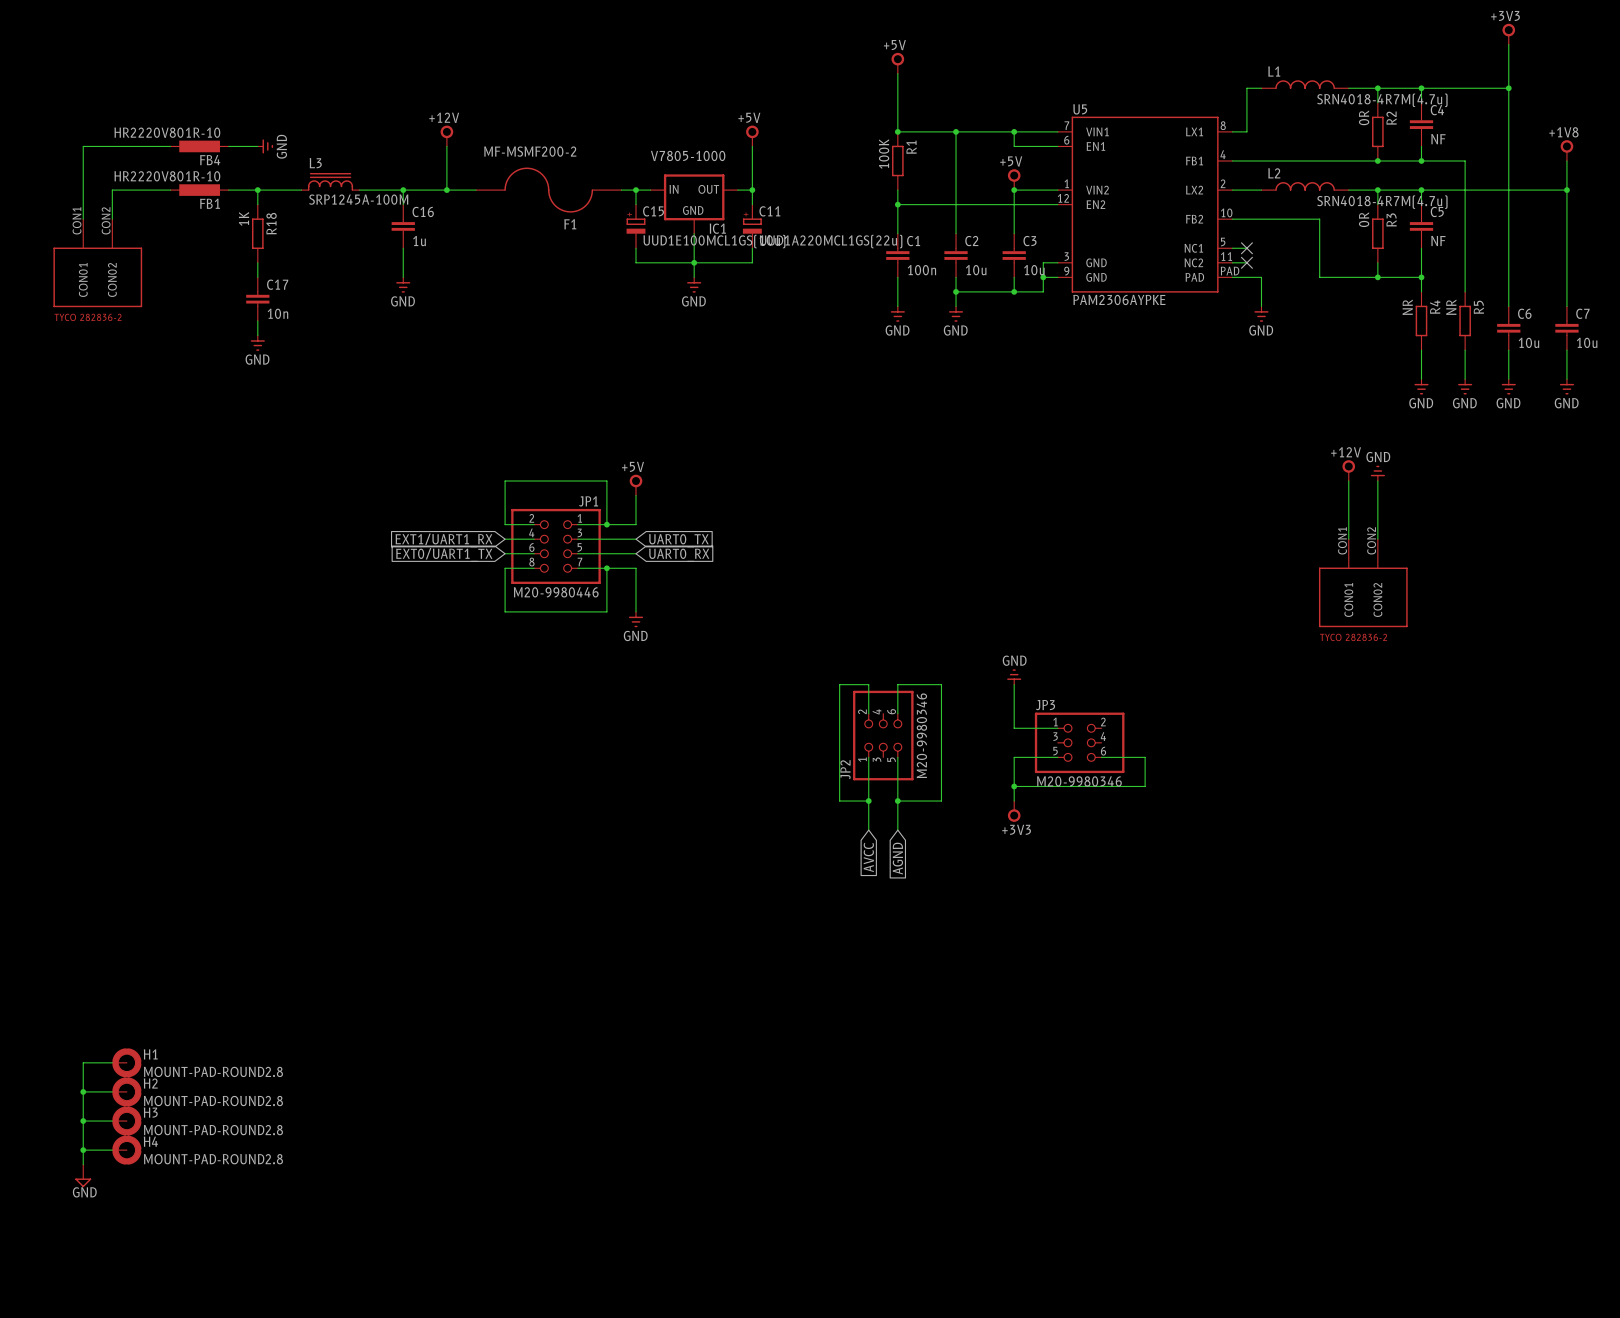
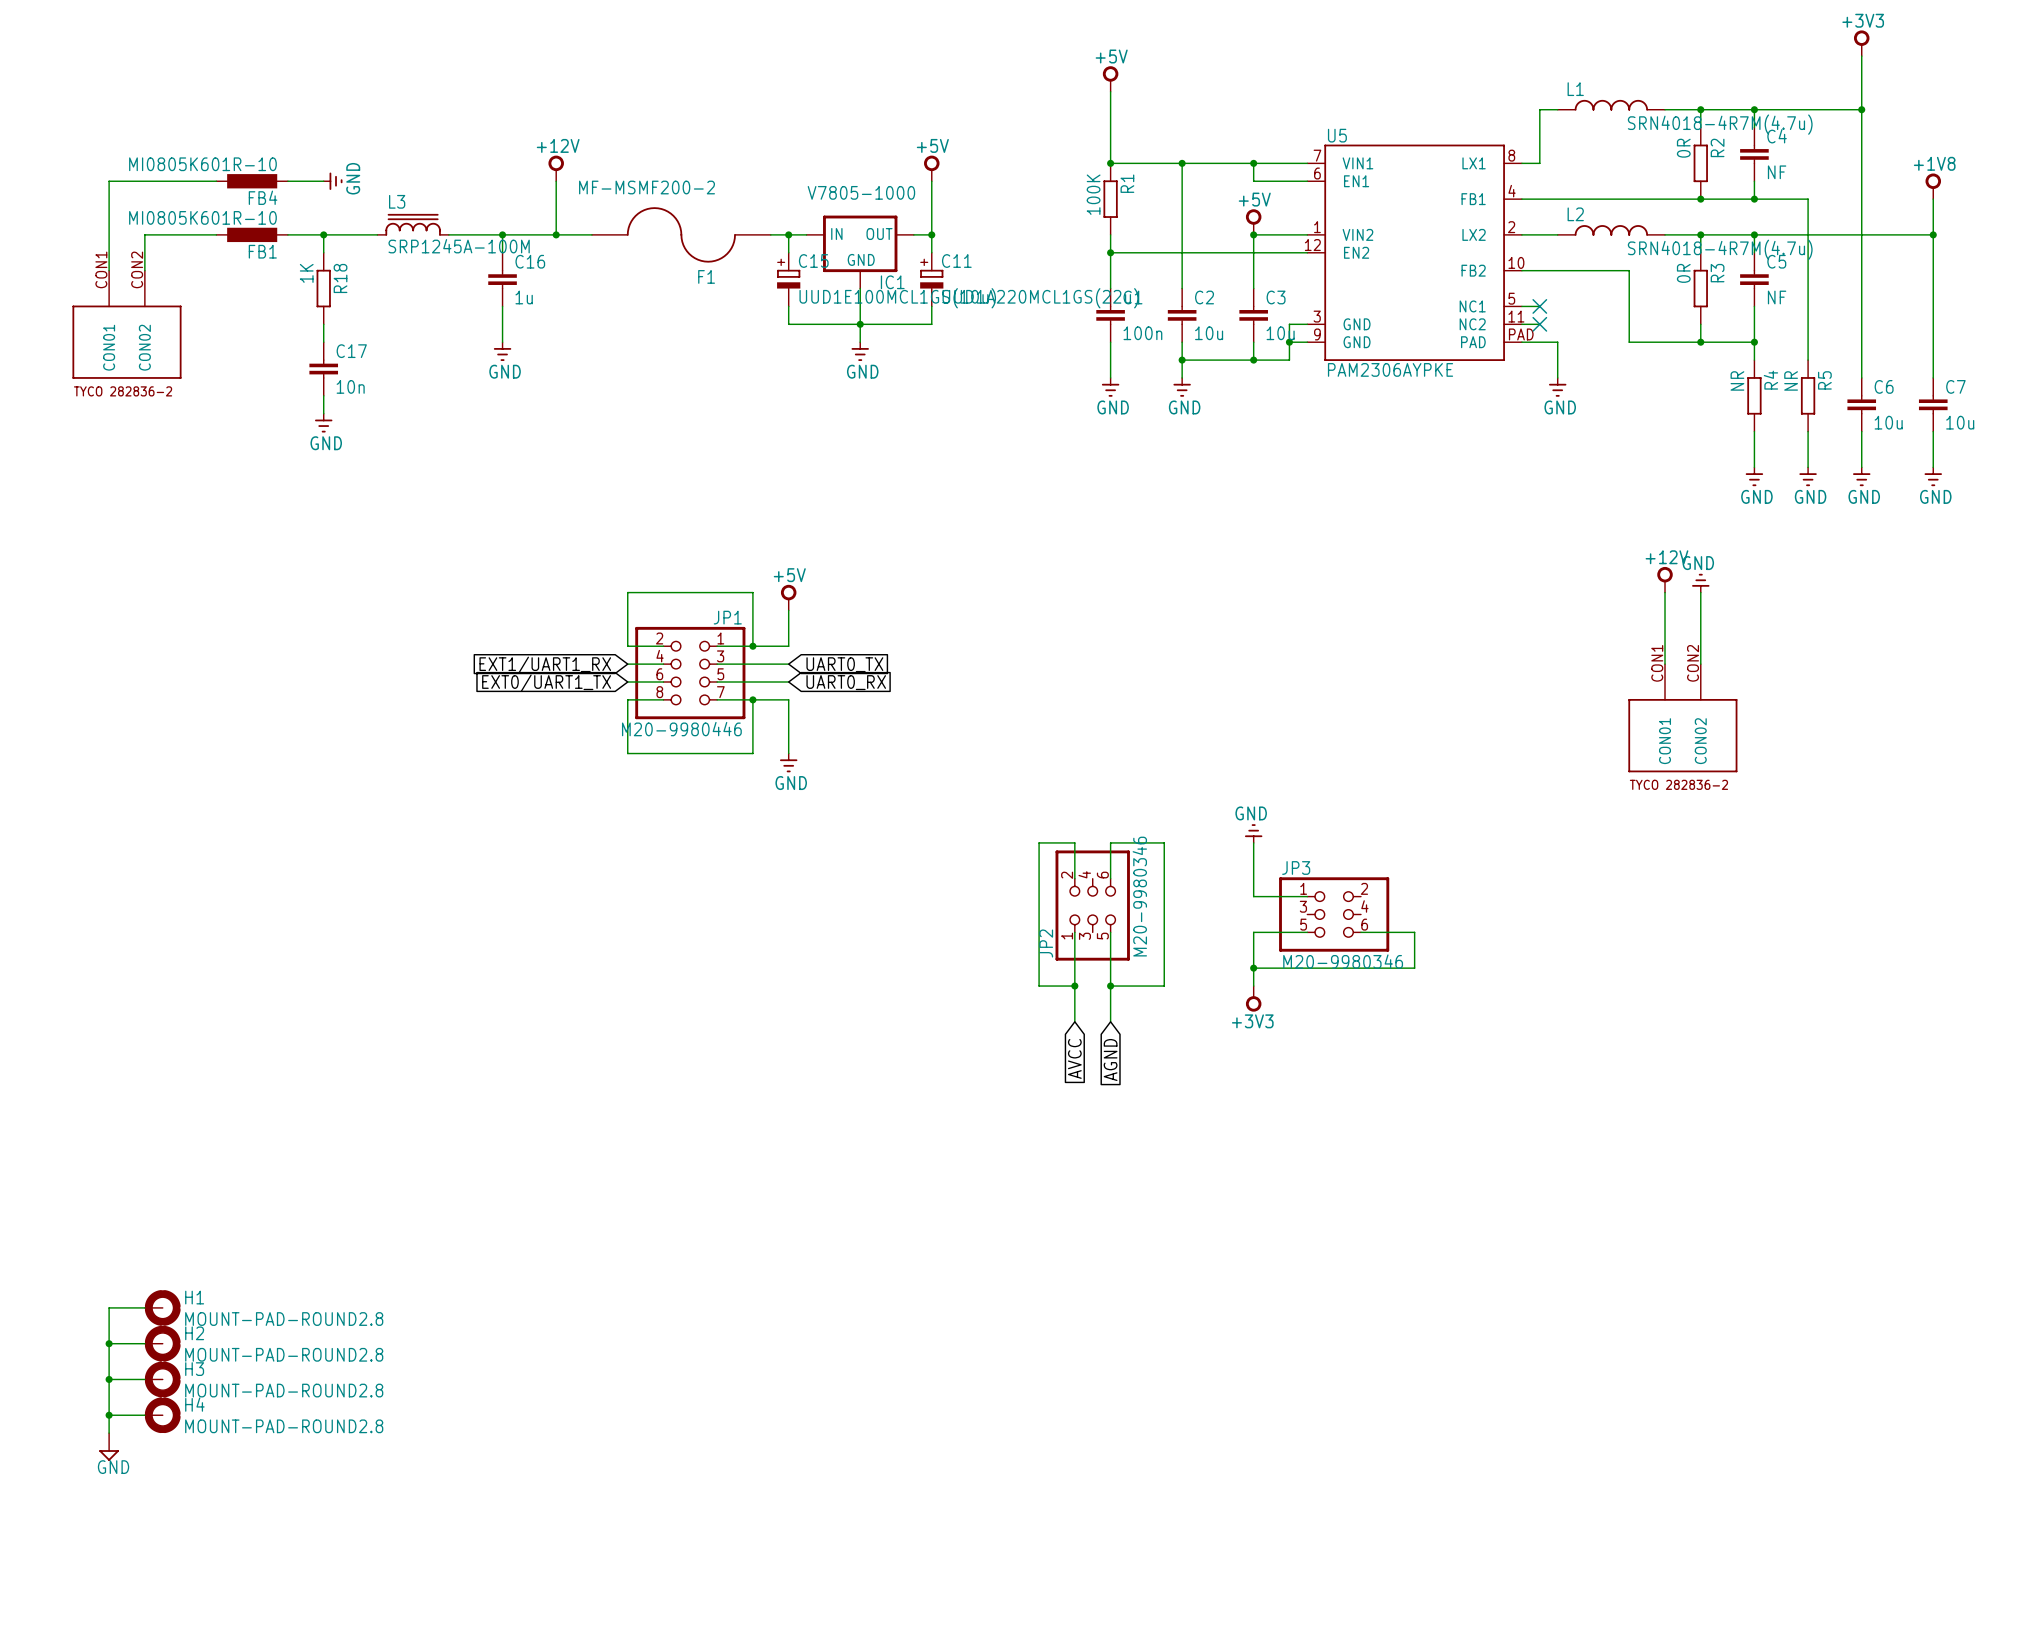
FB4 value: HR2220V801R-10 (167, 132) -> MI0805K601R-10 (202, 164)
FB1 value: HR2220V801R-10 (167, 176) -> MI0805K601R-10 (202, 217)

